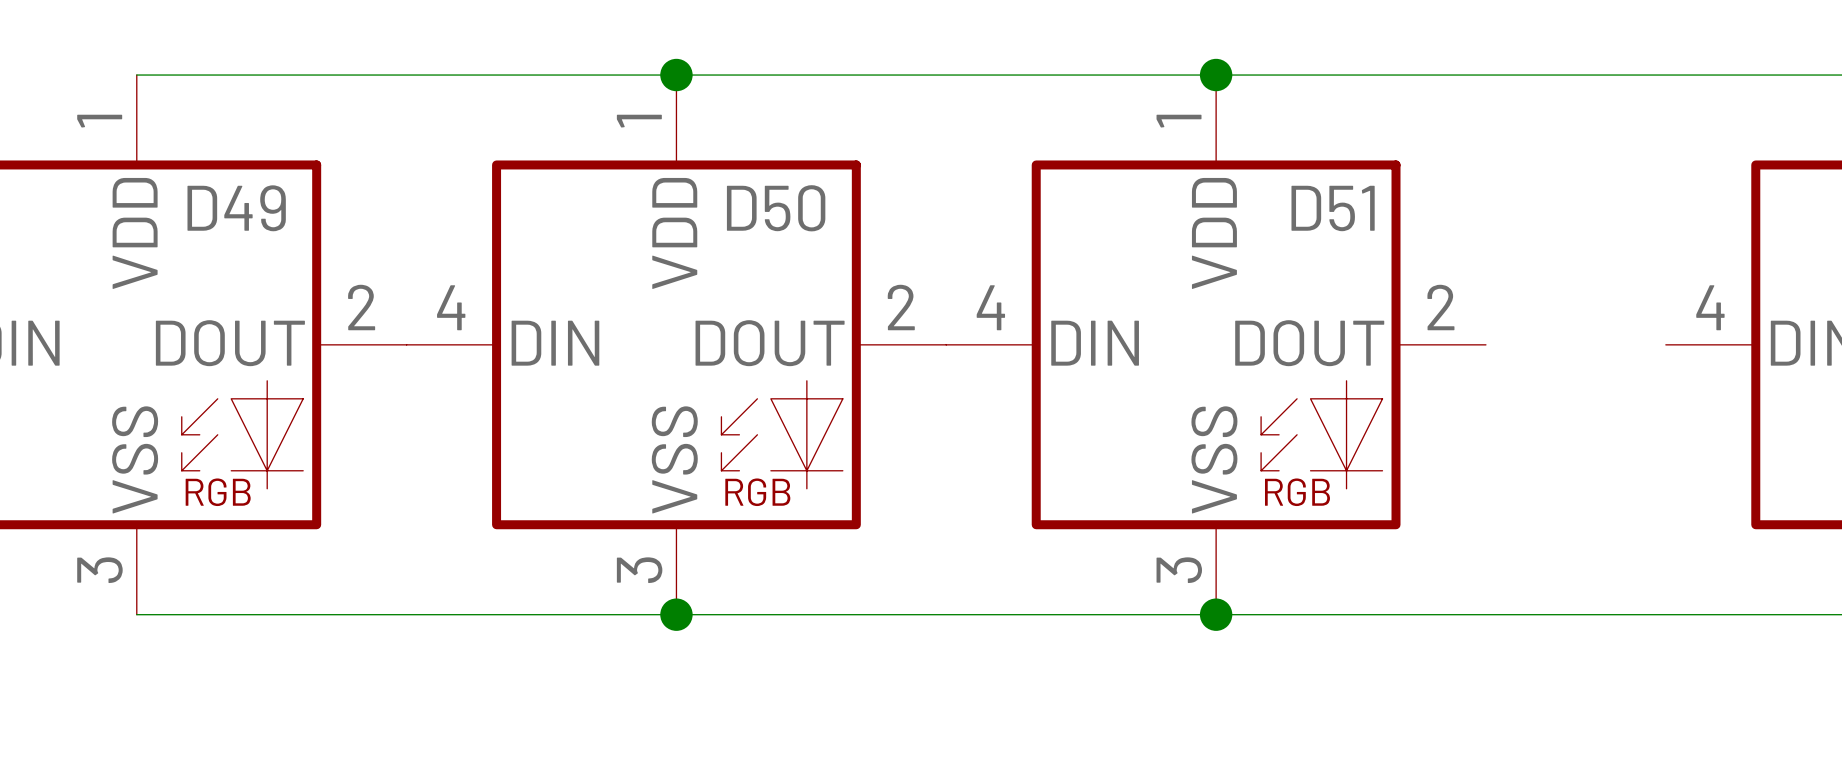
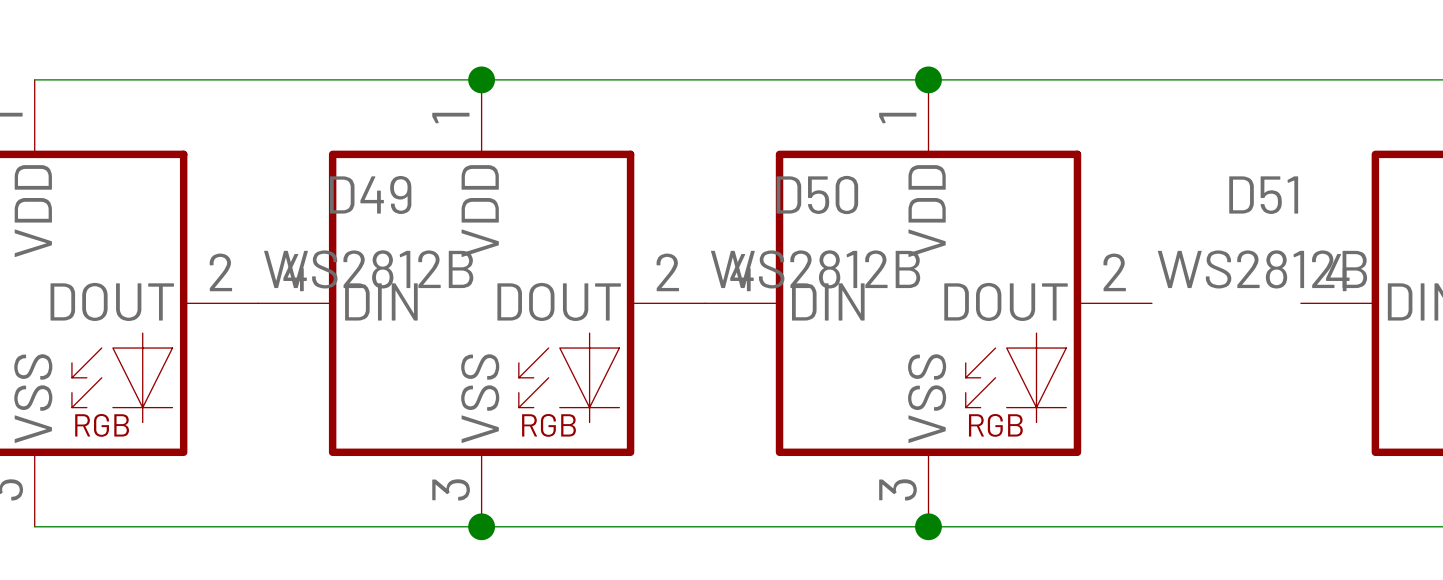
D49 name position: D49 (236, 208) -> D49 (370, 195)
D50 name position: D50 (776, 208) -> D50 (817, 195)
D51 name position: D51 (1333, 208) -> D51 (1263, 195)
D49 value: none -> WS2812B (368, 269)
D50 value: none -> WS2812B (815, 269)
D51 value: none -> WS2812B (1262, 269)

